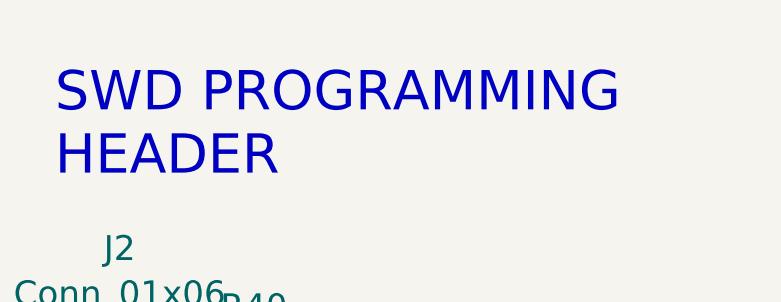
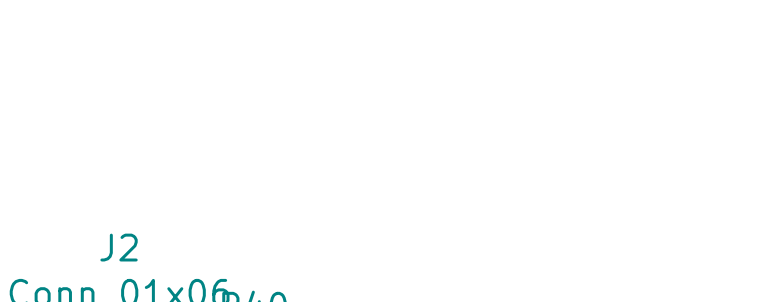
text: SWD PROGRAMMING (337, 89) -> none
text: HEADER (169, 152) -> none

